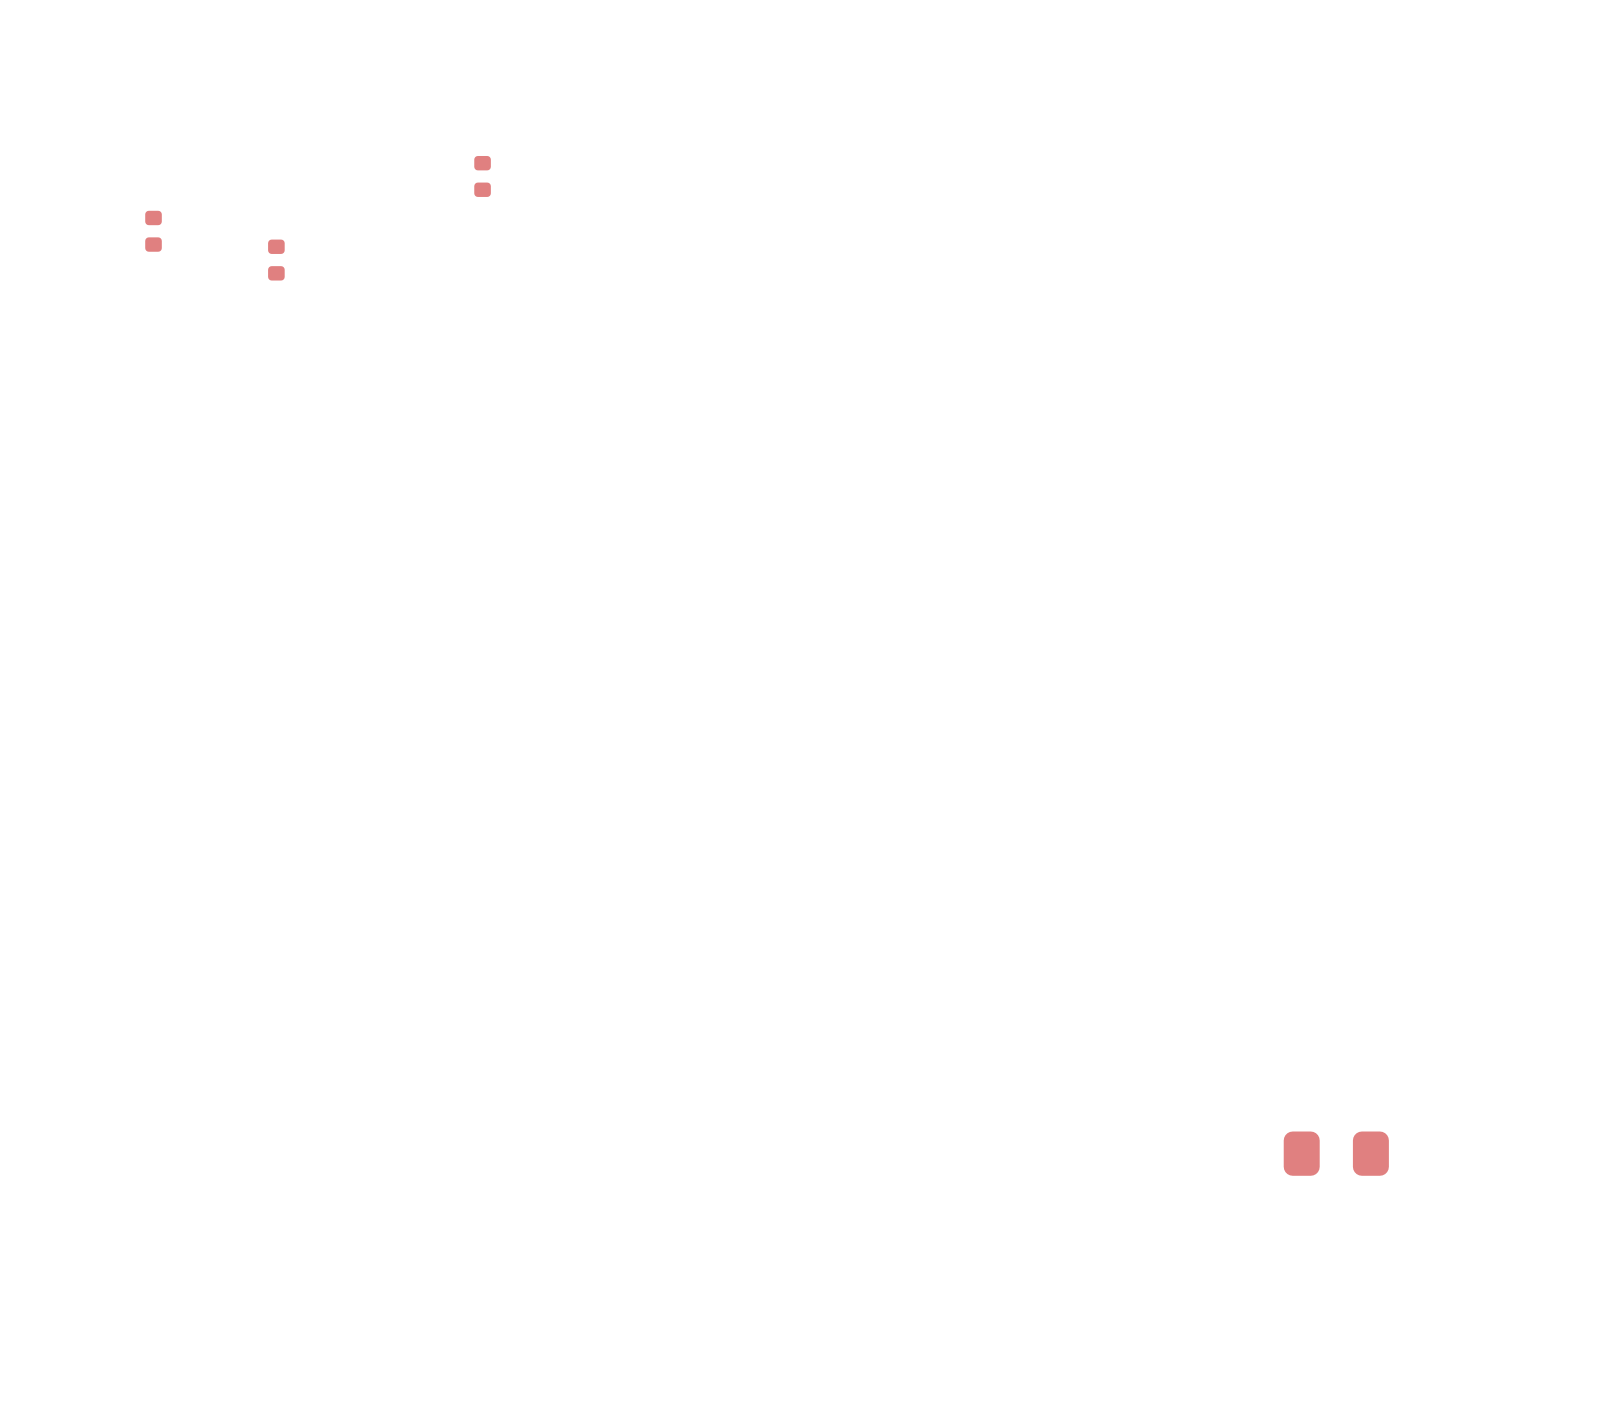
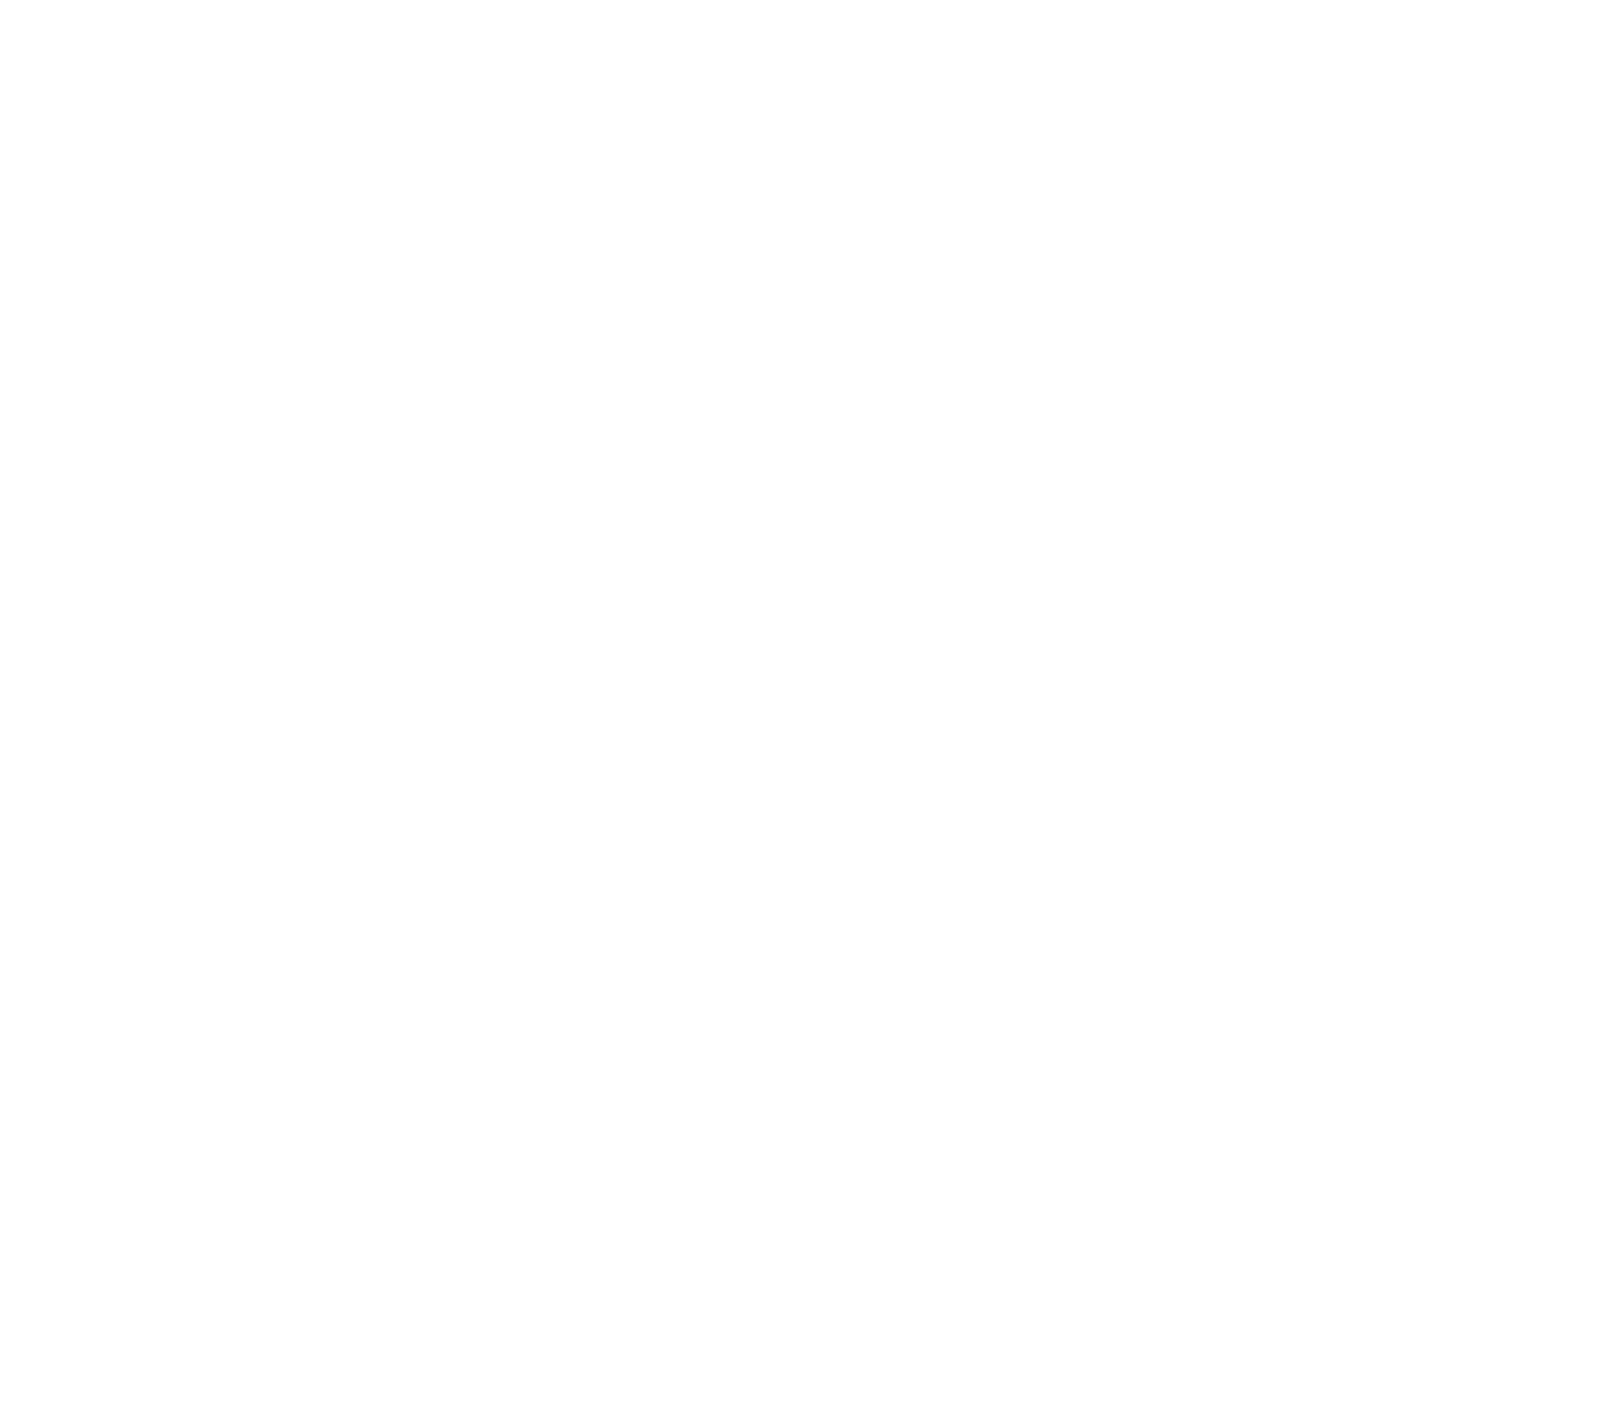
part: (482, 176) -> none
part: (153, 231) -> none
part: (276, 260) -> none
part: (1336, 1153) -> none

